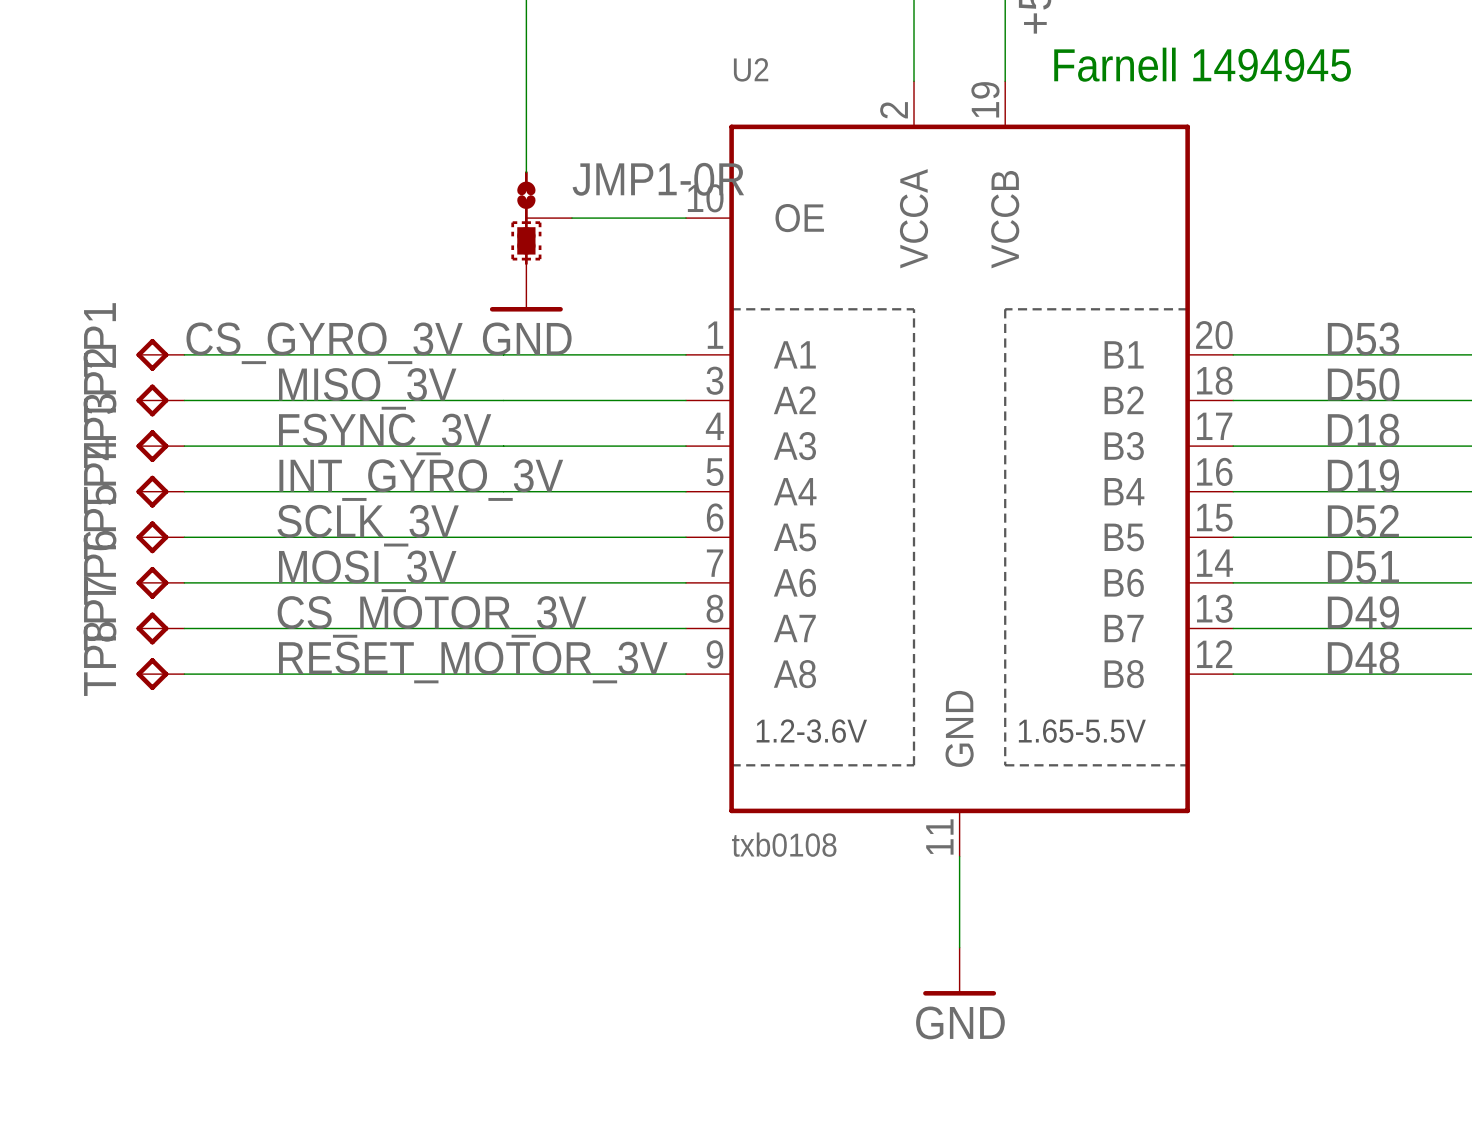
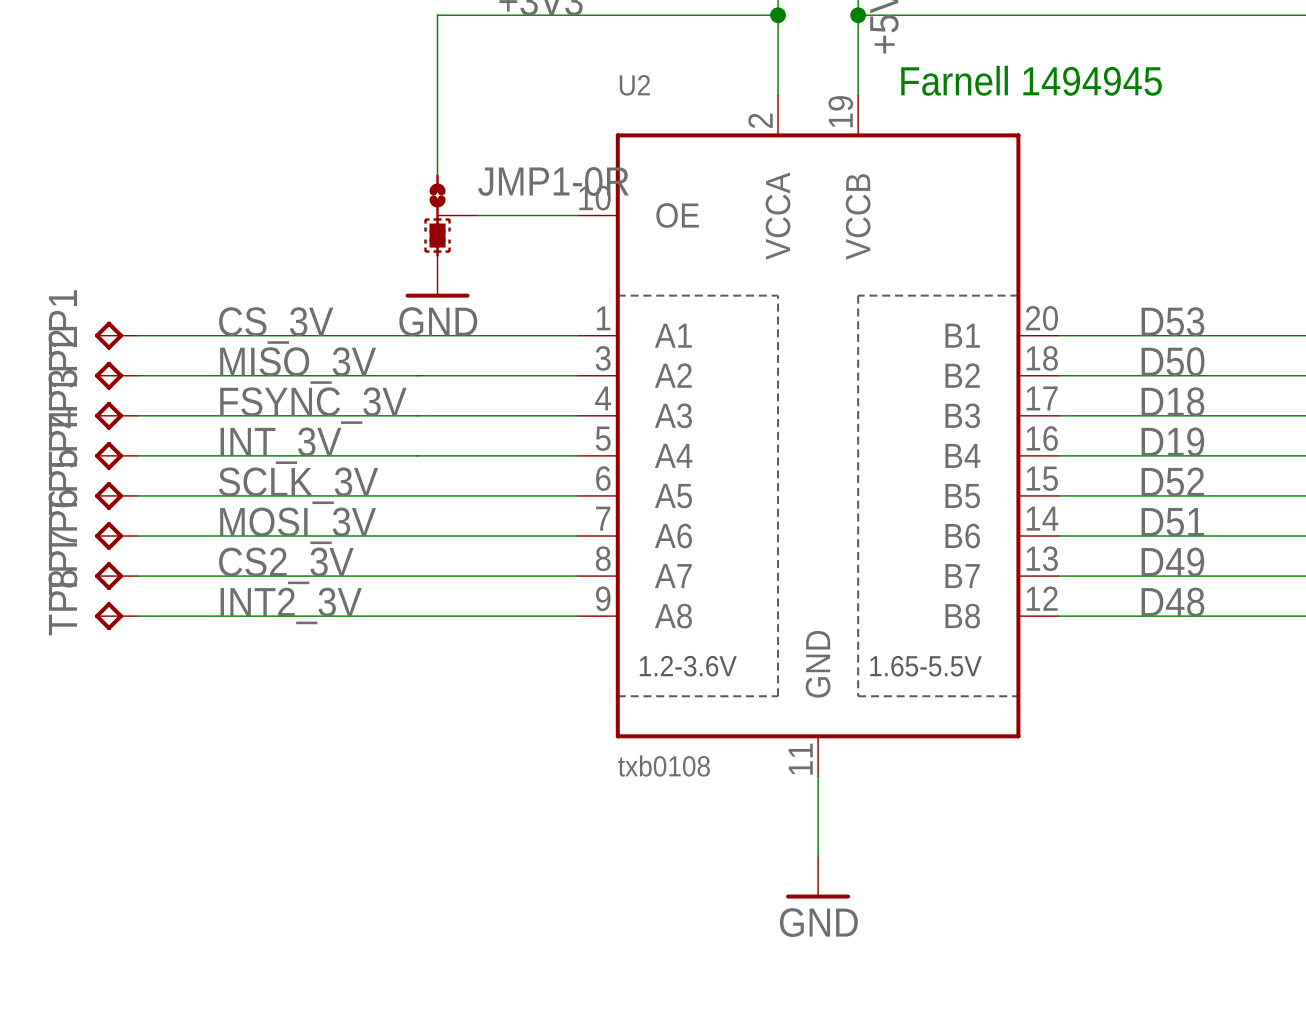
label: CS_GYRO_3V (324, 343) -> CS_3V (276, 325)
label: INT_GYRO_3V (421, 480) -> INT_3V (280, 445)
label: CS_MOTOR_3V (432, 616) -> CS2_3V (286, 565)
label: RESET_MOTOR_3V (473, 662) -> INT2_3V (291, 605)

